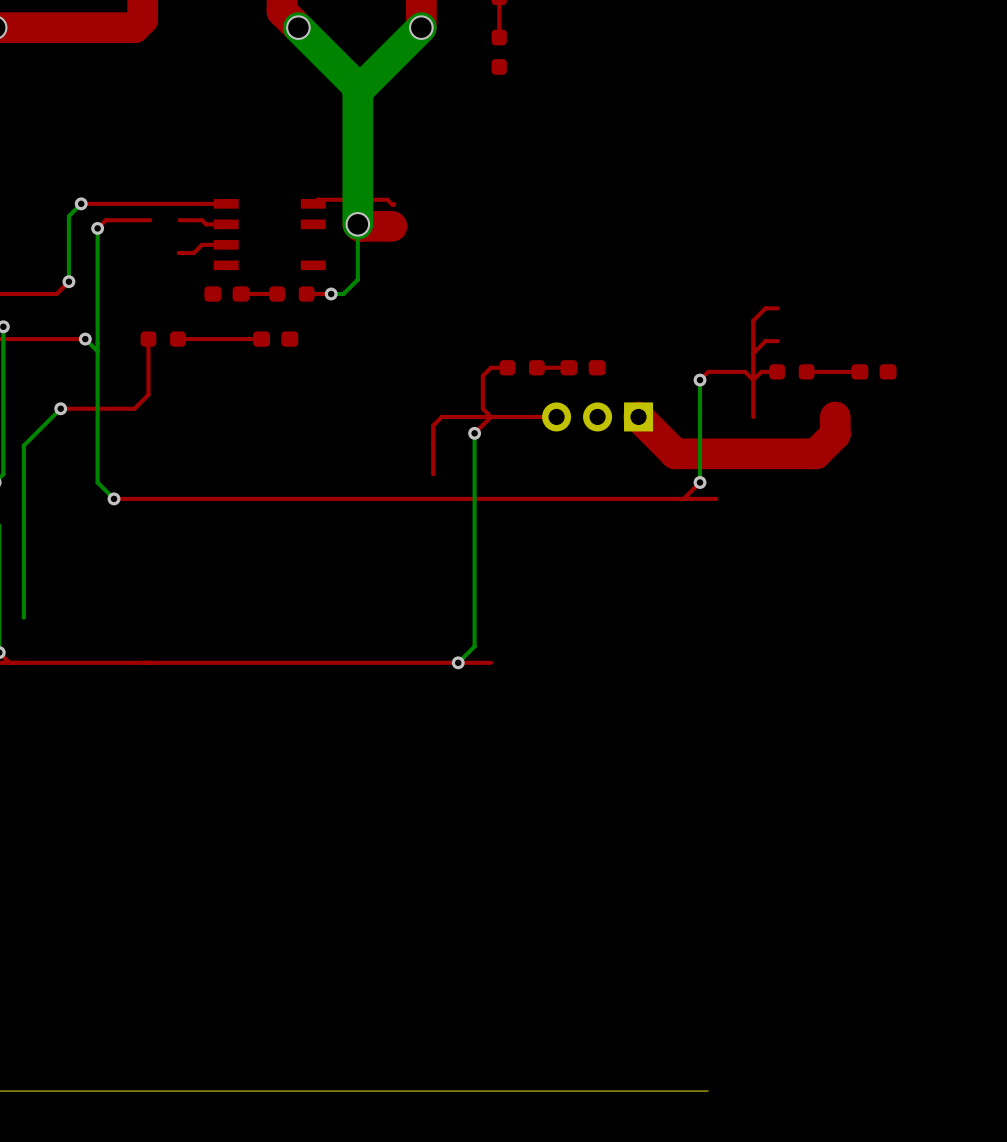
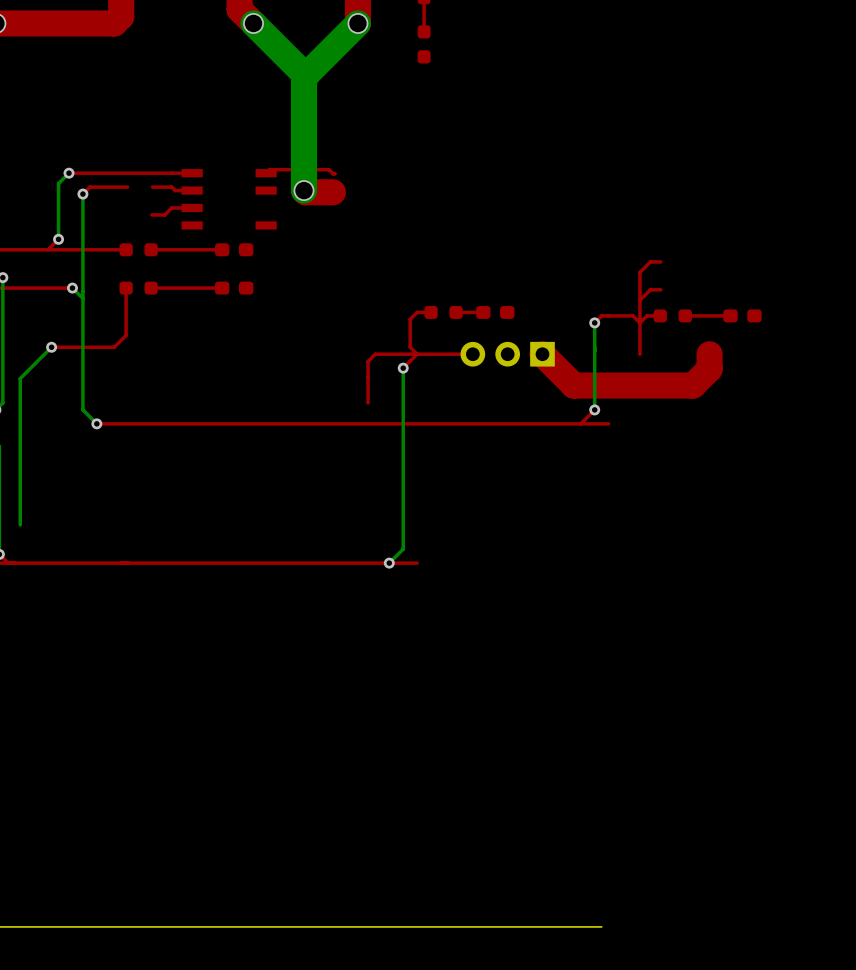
bottom track: (357, 224) (357, 279) (343, 294) (331, 294) -> none
top track: none -> (126, 249) (48, 249)
part position: (226, 294) -> (234, 249)
top track: none -> (204, 249) (151, 249)
top track: (277, 294) (261, 294) -> none
part position: (291, 294) -> (138, 249)
top track: (331, 294) (306, 294) -> none
via: (331, 294) -> none

